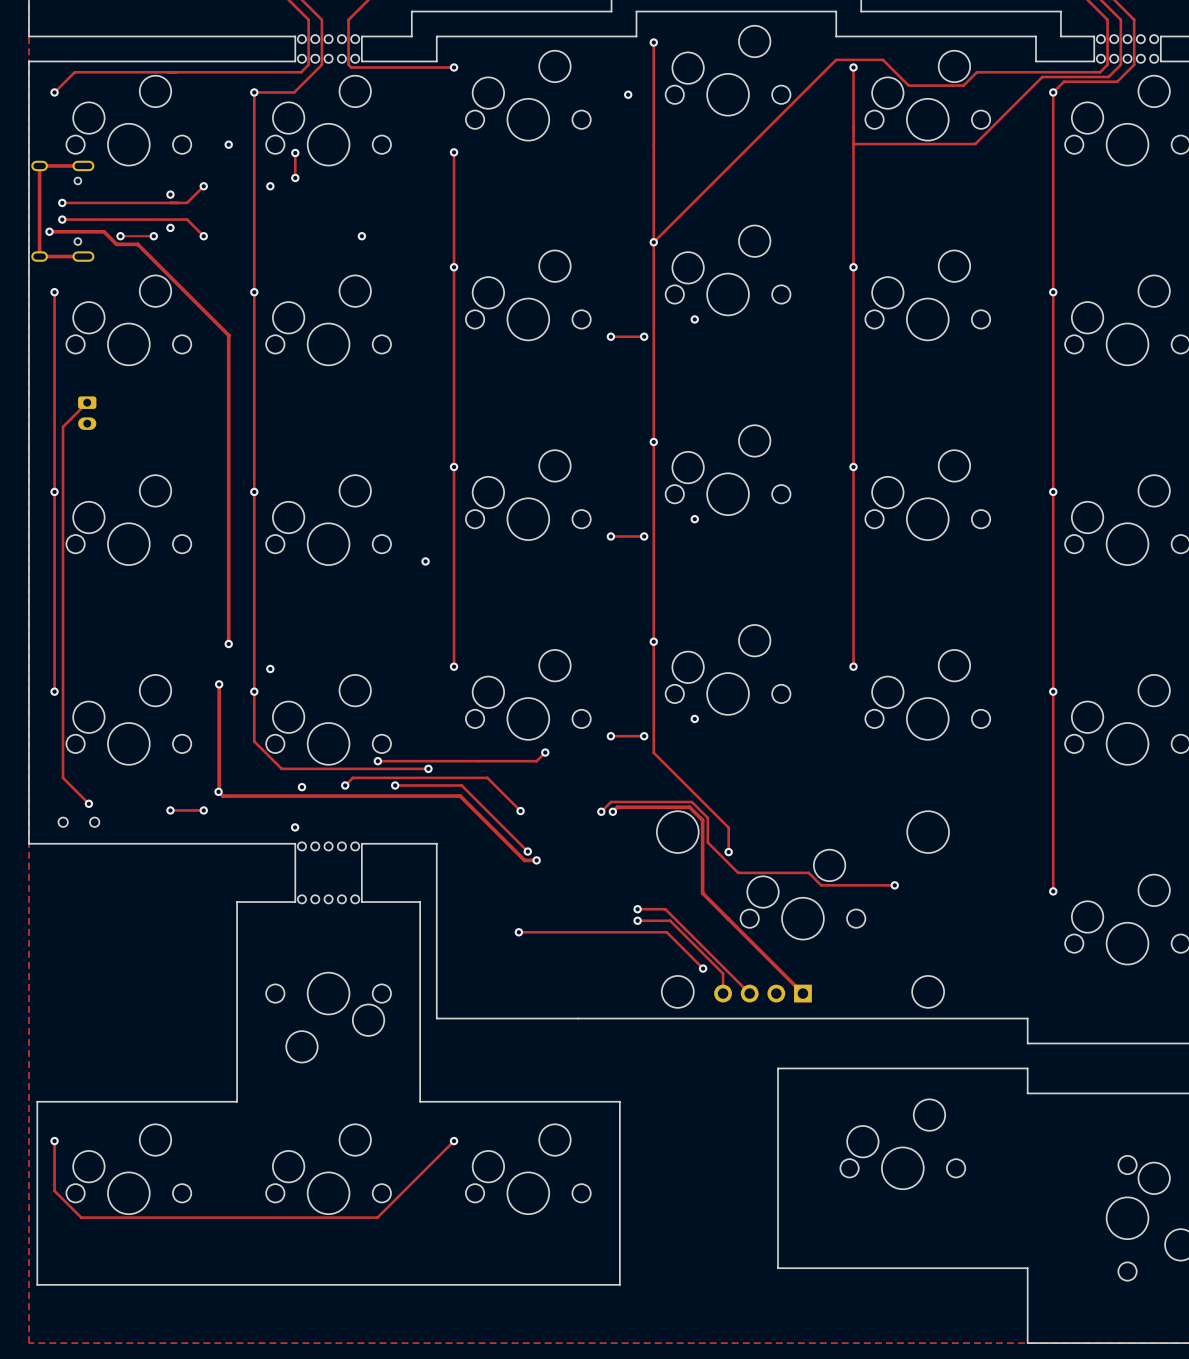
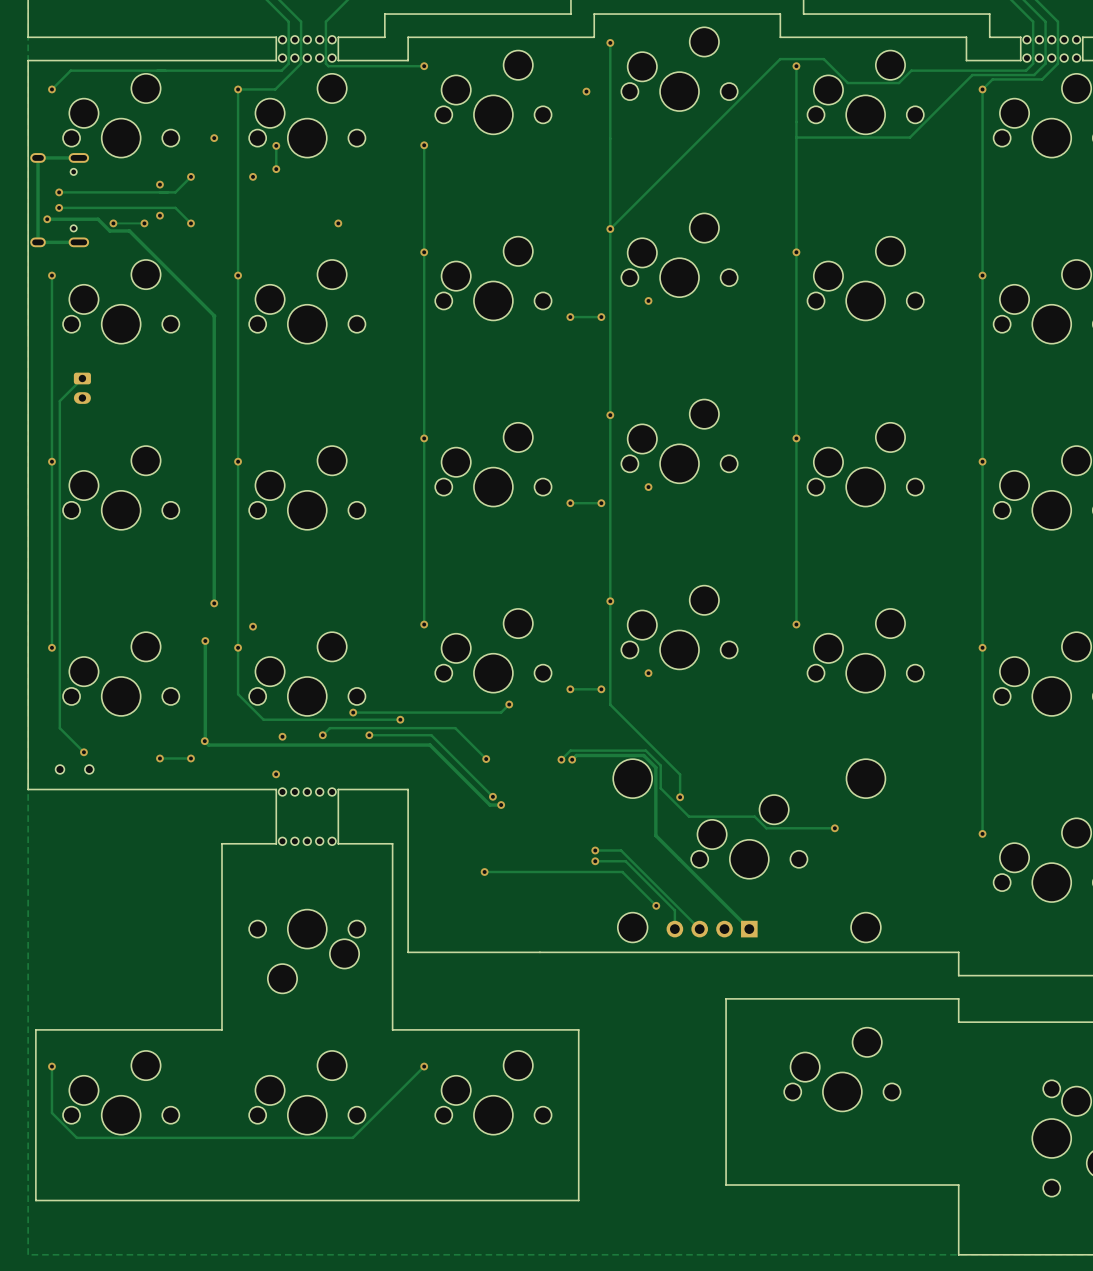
via: (425, 561) -> none

